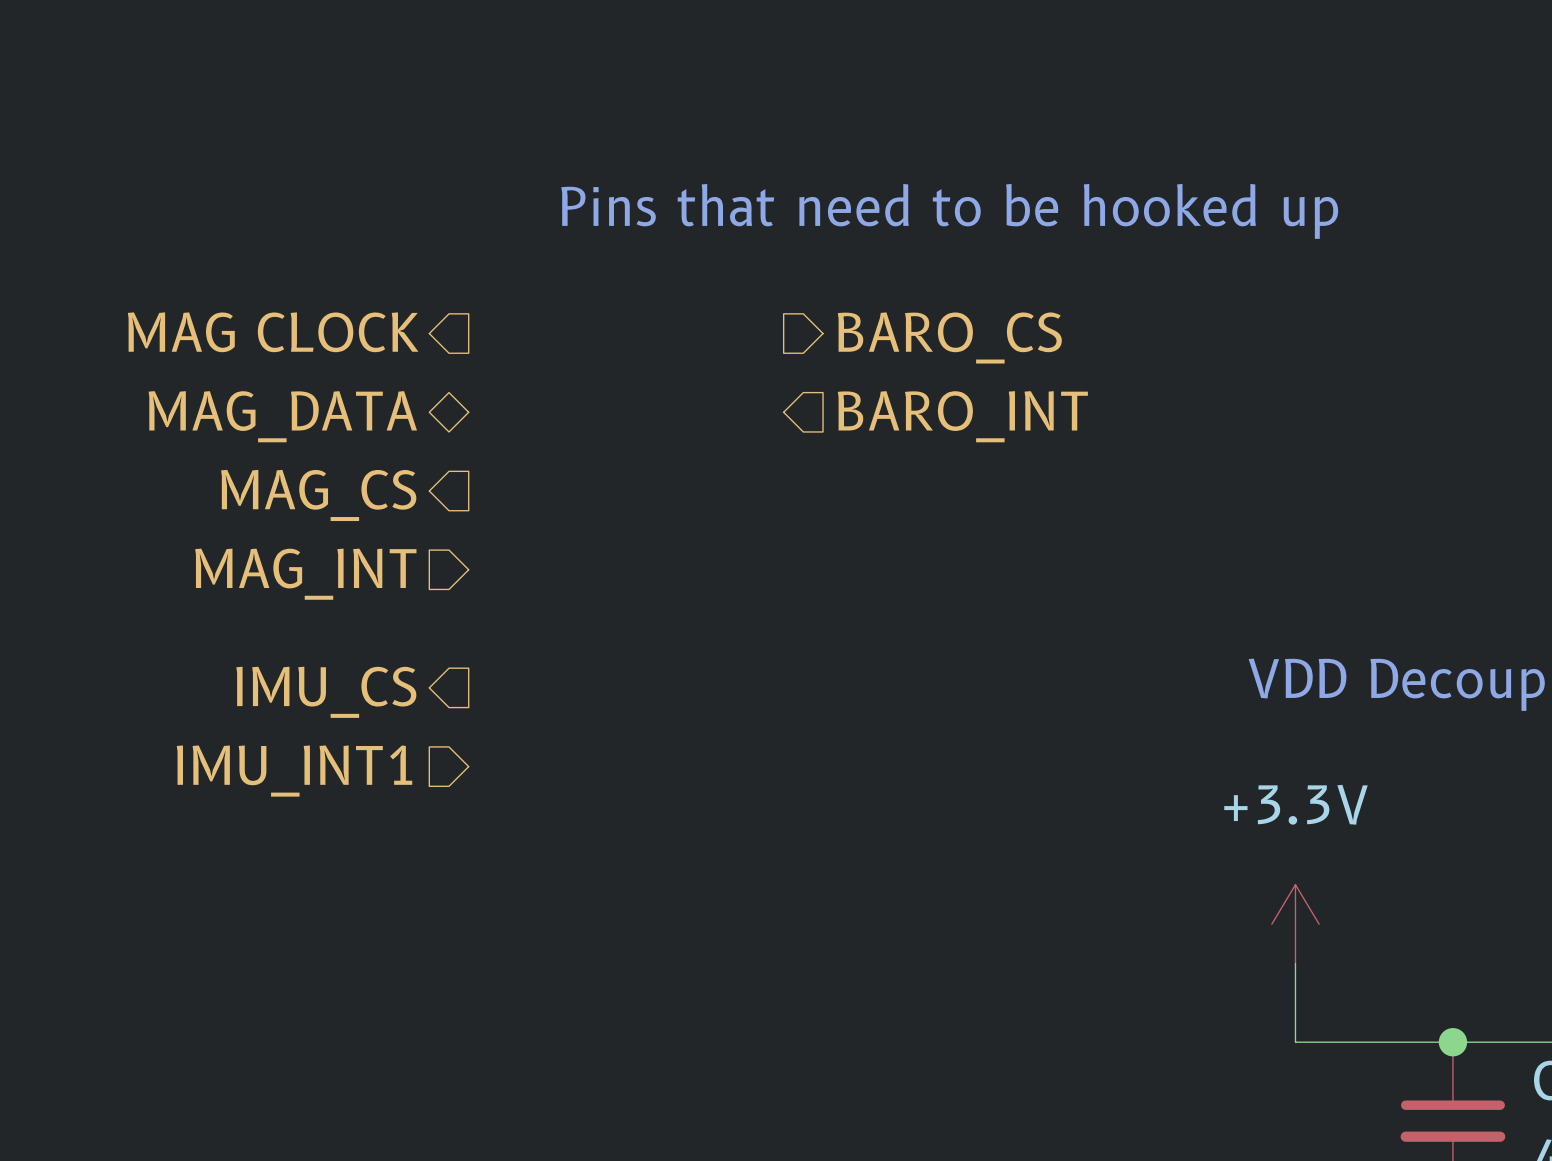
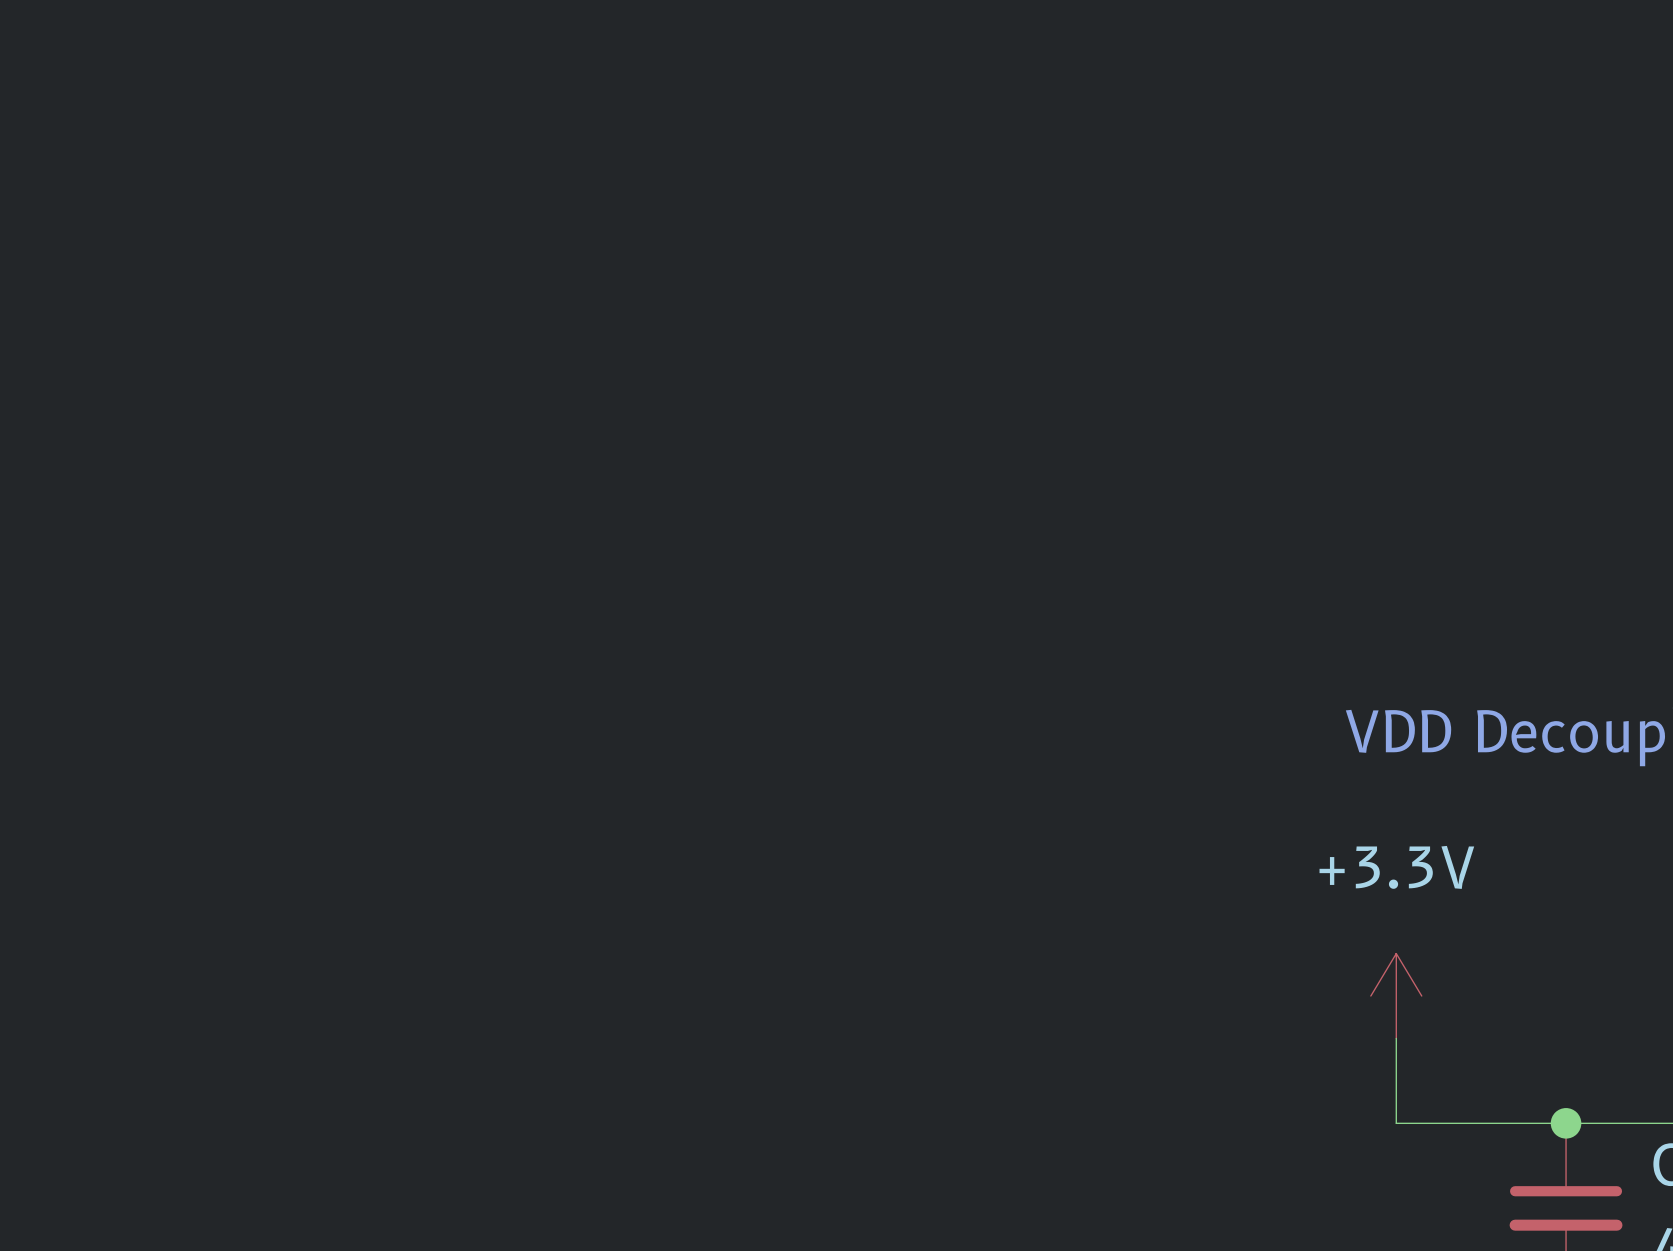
text: Pins that need to be hooked up (949, 211) -> none
hierarchical label: MAG CLOCK (273, 332) -> none
hierarchical label: BARO_CS (949, 337) -> none
hierarchical label: MAG_DATA (282, 416) -> none
hierarchical label: BARO_INT (962, 416) -> none
hierarchical label: MAG_CS (318, 495) -> none
hierarchical label: MAG_INT (305, 574) -> none
hierarchical label: IMU_CS (326, 692) -> none
hierarchical label: IMU_INT1 (294, 771) -> none

